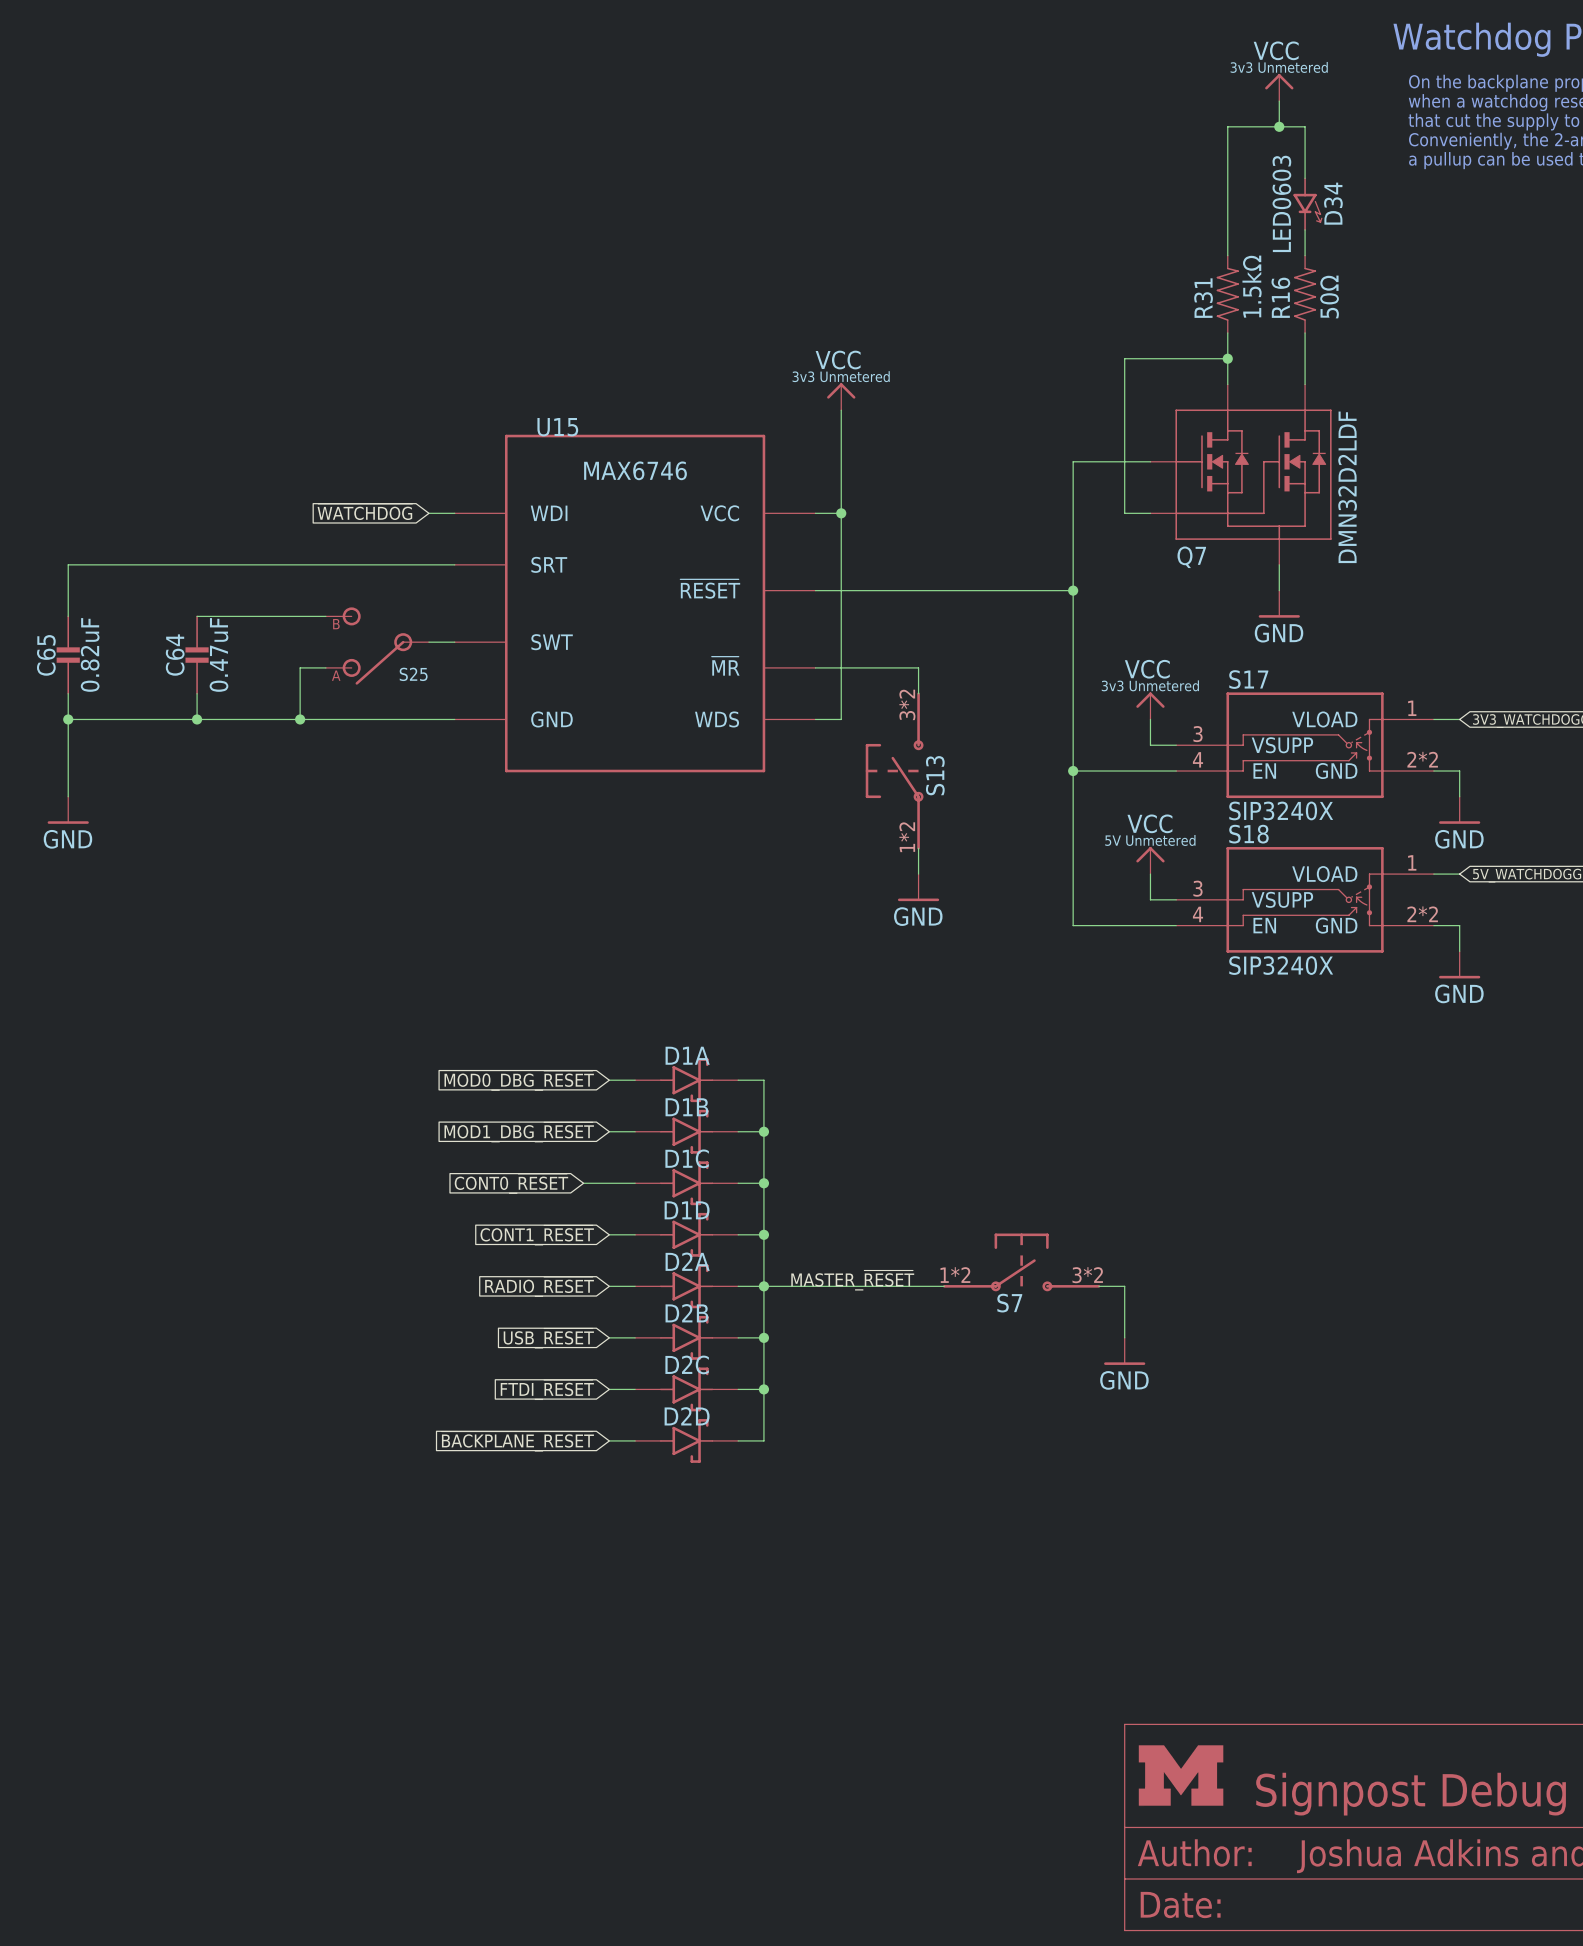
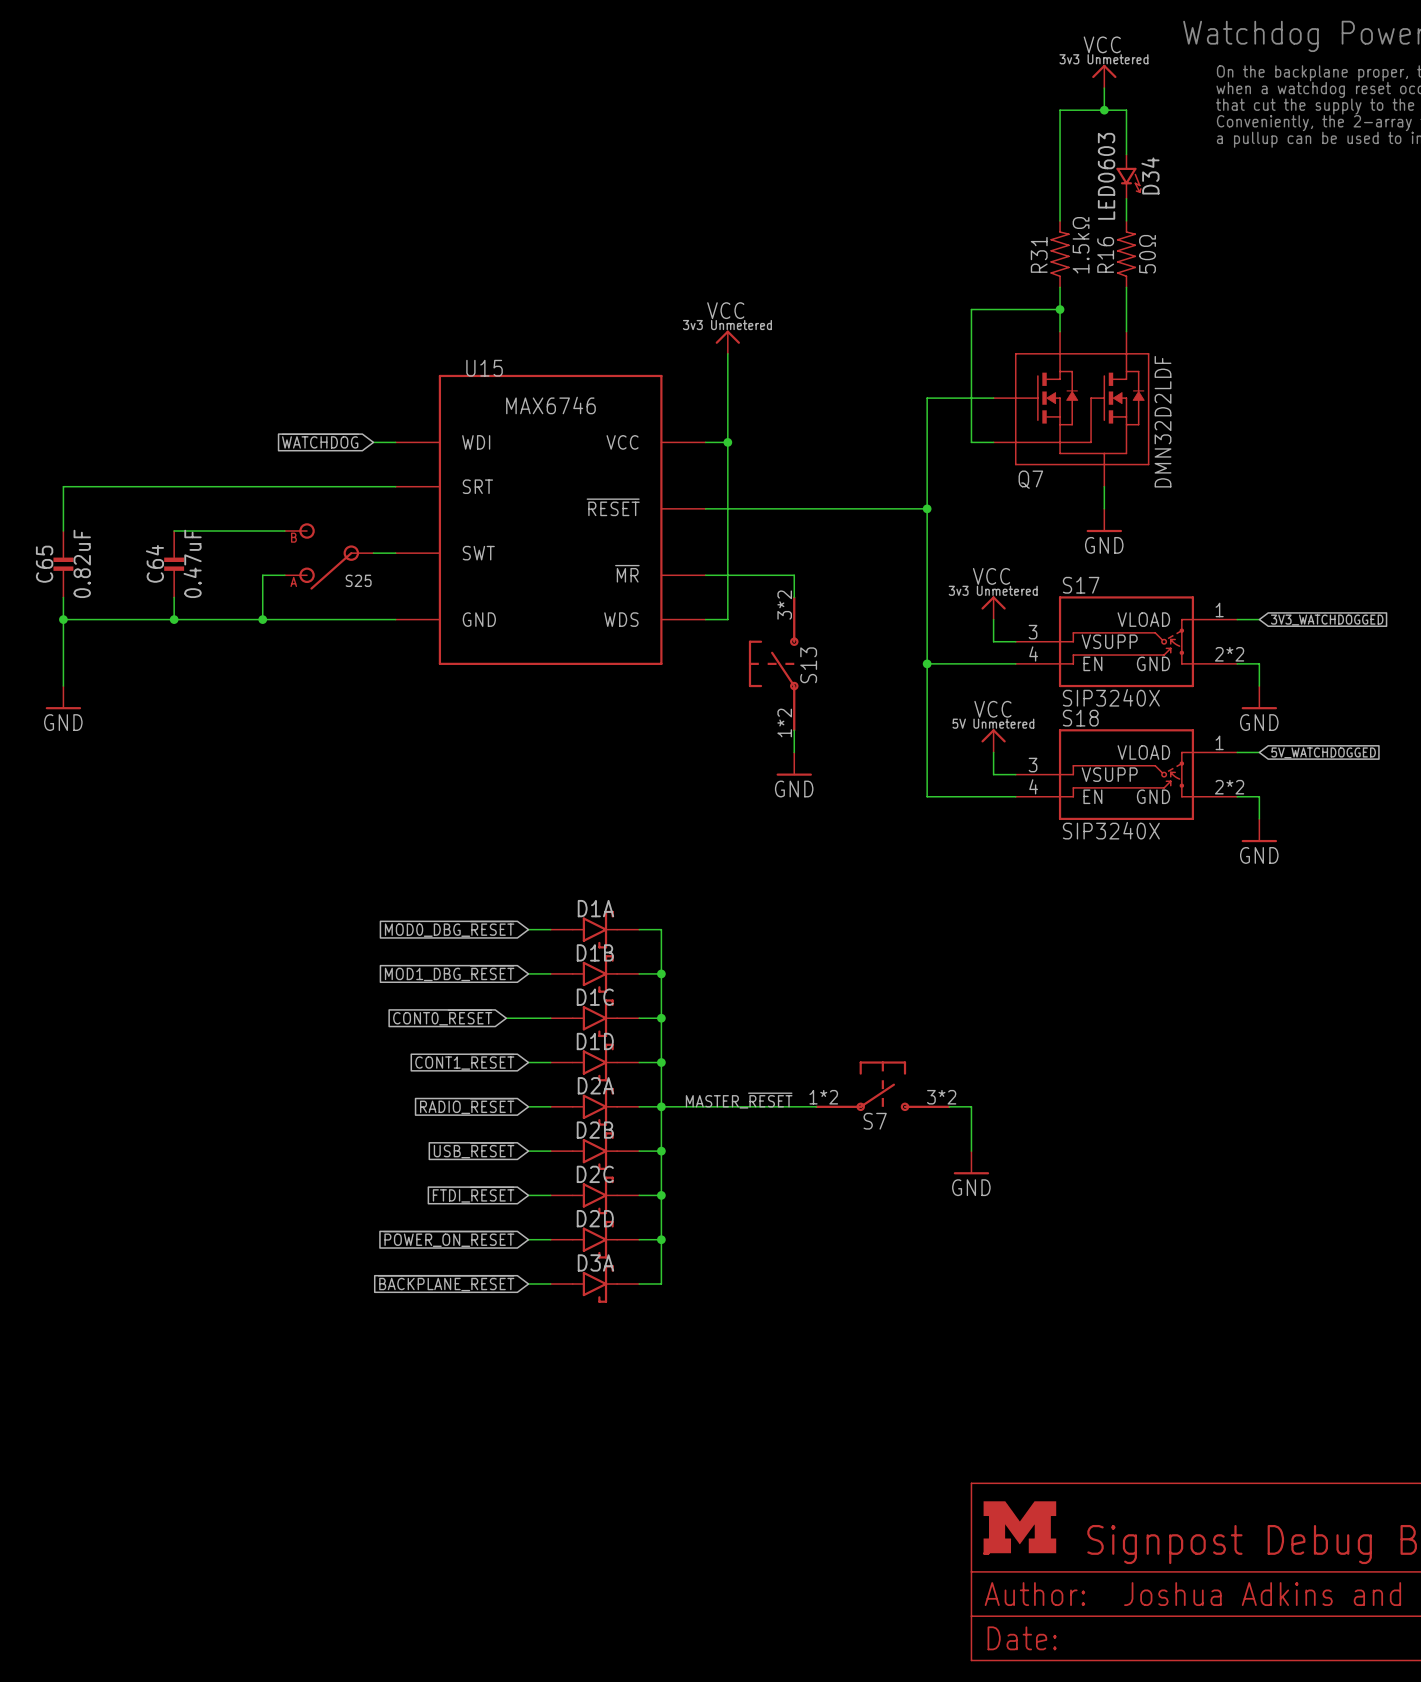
wire: none -> (661, 1239) (661, 1284) (639, 1284)
junction: none -> (661, 1239)
global label: ~{BACKPLANE_RESET} (517, 1441) -> ~{POWER_ON_RESET} (448, 1238)
wire: none -> (528, 1284) (550, 1284)
D3A: none -> (594, 1284)
global label: none -> ~{BACKPLANE_RESET} (446, 1283)

